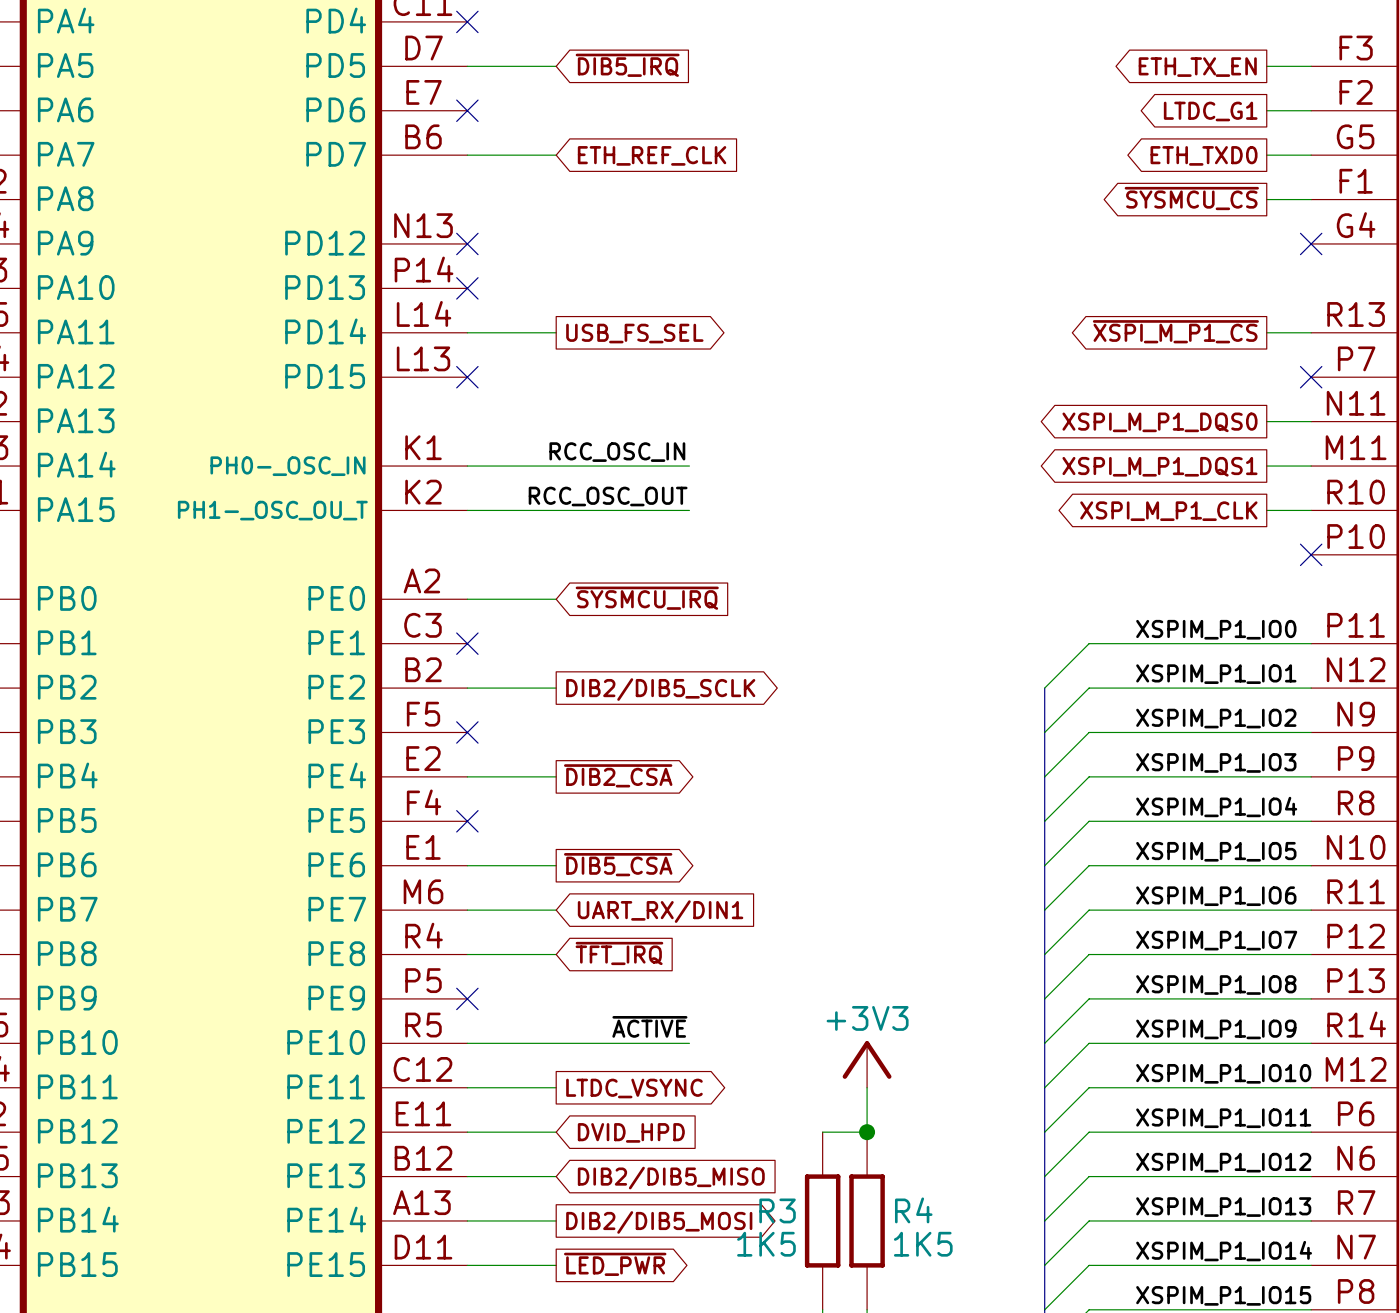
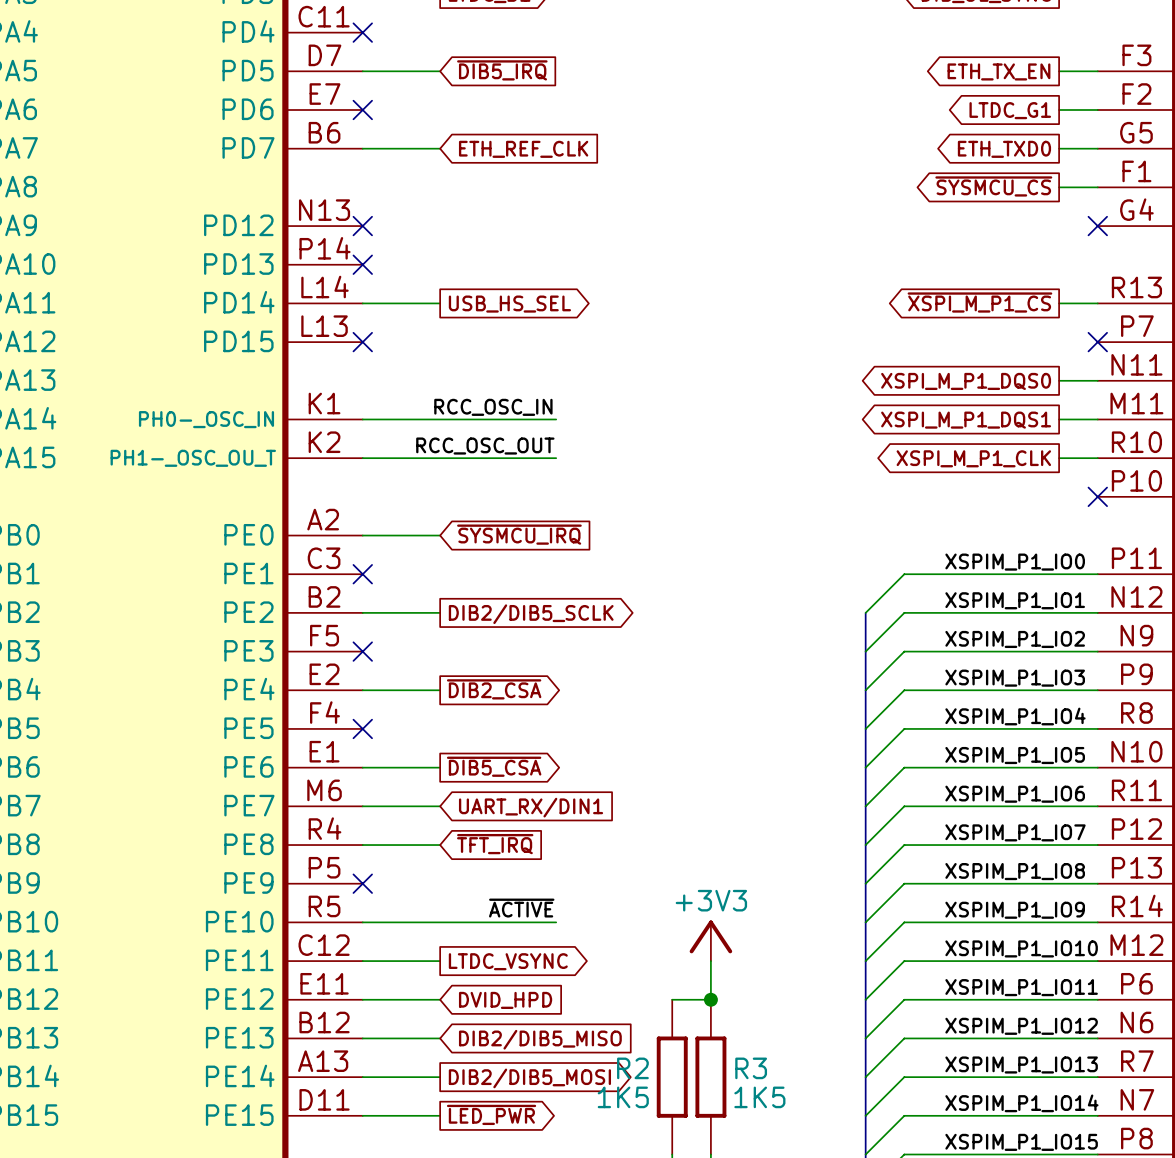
global label: USB_FS_SEL (634, 333) -> USB_HS_SEL (509, 304)
R3 name: R3 (777, 1210) -> R2 (632, 1068)
R4 name: R4 (913, 1210) -> R3 (751, 1068)

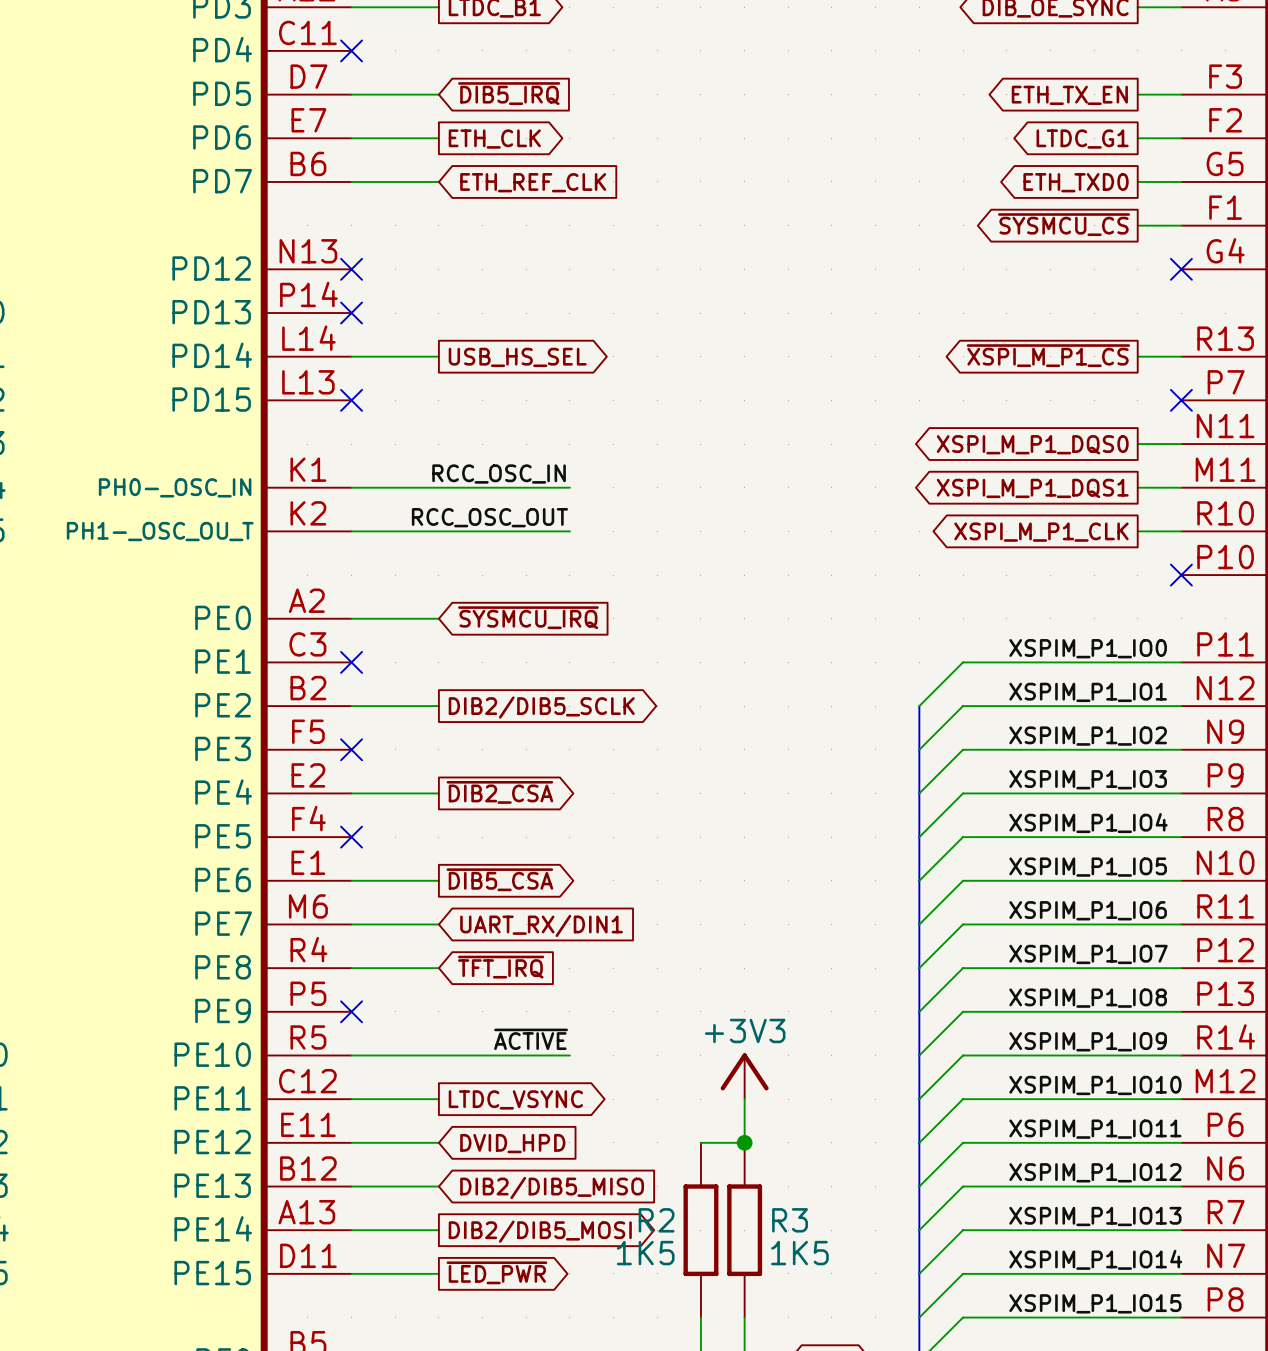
wire: none -> (351, 138) (438, 138)
no-connect mark: (362, 110) -> none
global label: none -> ETH_CLK (494, 139)

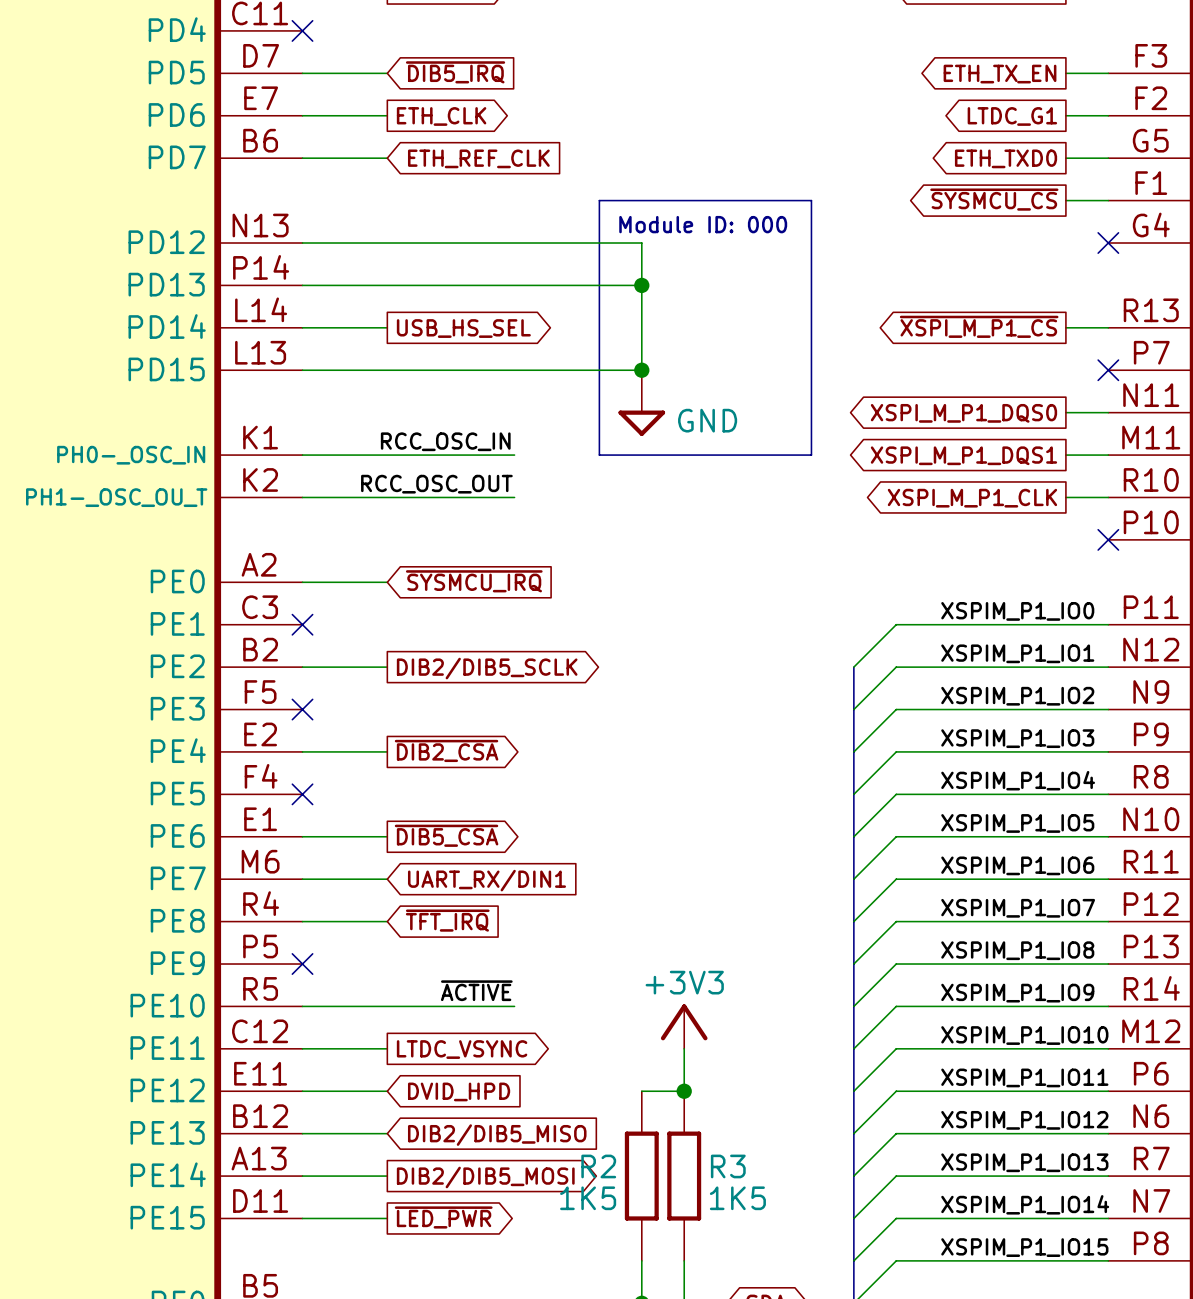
line: none -> (599, 200) (811, 200) (811, 455) (599, 455) (599, 200)
text: none -> Module ID: 000 (703, 224)
wire: none -> (302, 243) (641, 243) (641, 370) (302, 370)
no-connect mark: (351, 269) -> none
wire: none -> (302, 285) (641, 285)
no-connect mark: (351, 313) -> none
junction: none -> (641, 285)
no-connect mark: (351, 400) -> none
junction: none -> (641, 370)
power symbol: none -> GND (641, 403)

